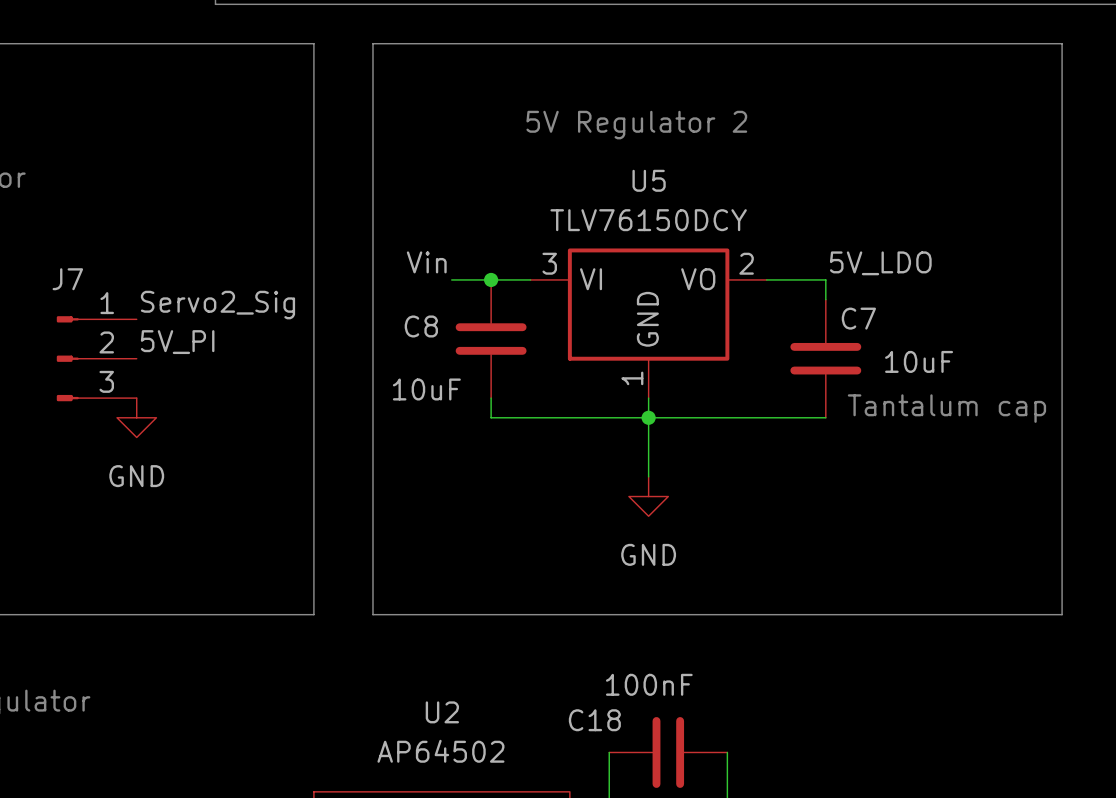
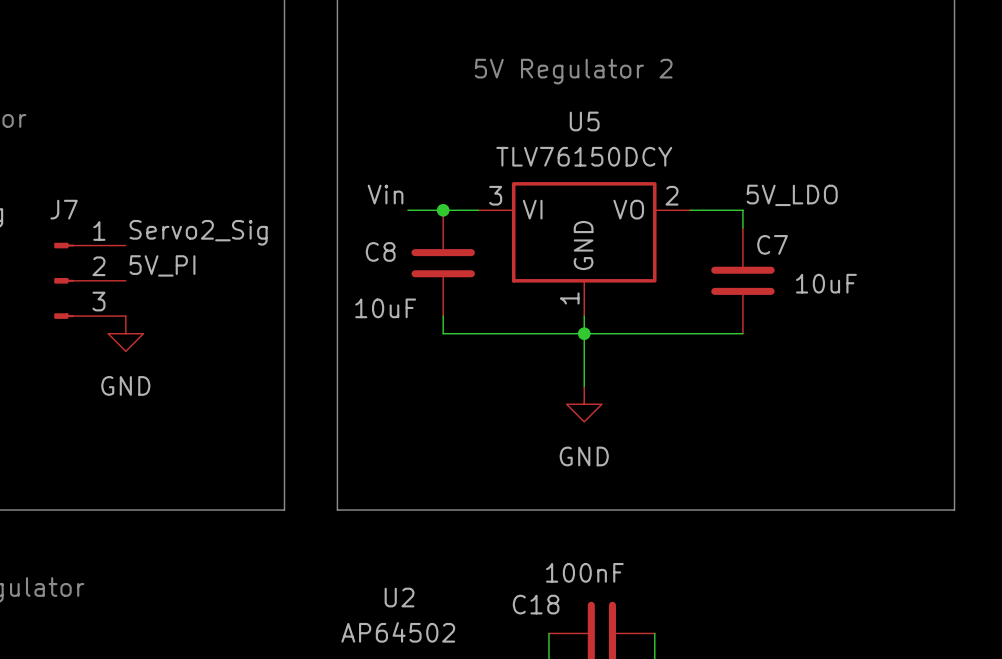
text: Tantalum cap (946, 408) -> none

